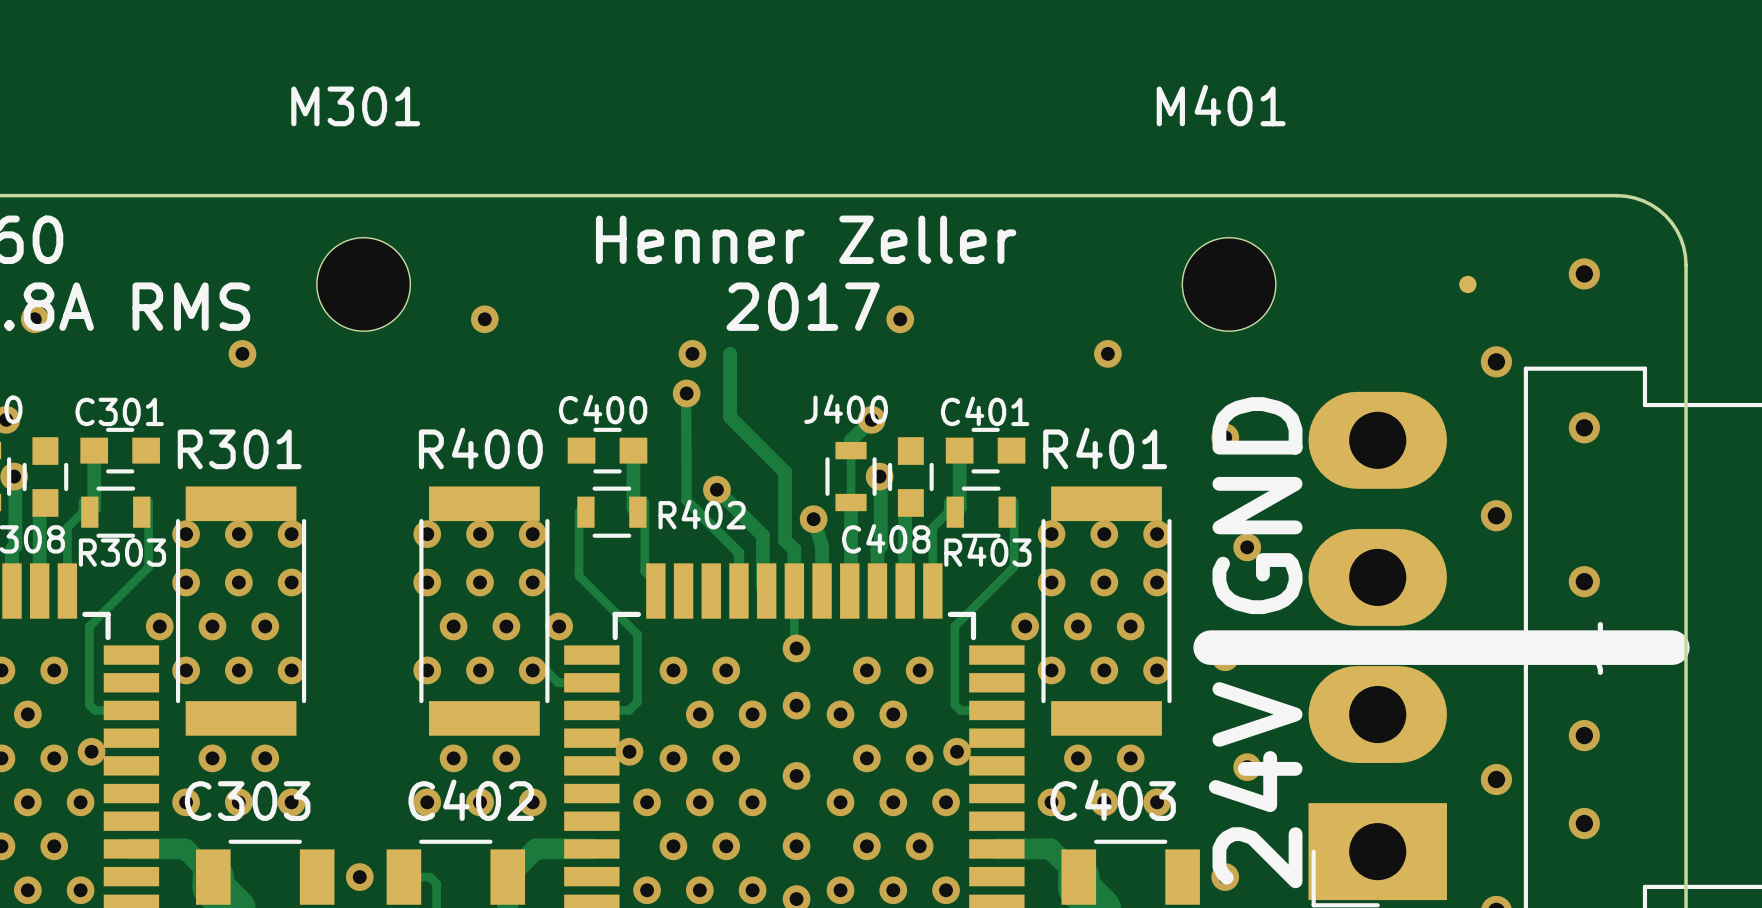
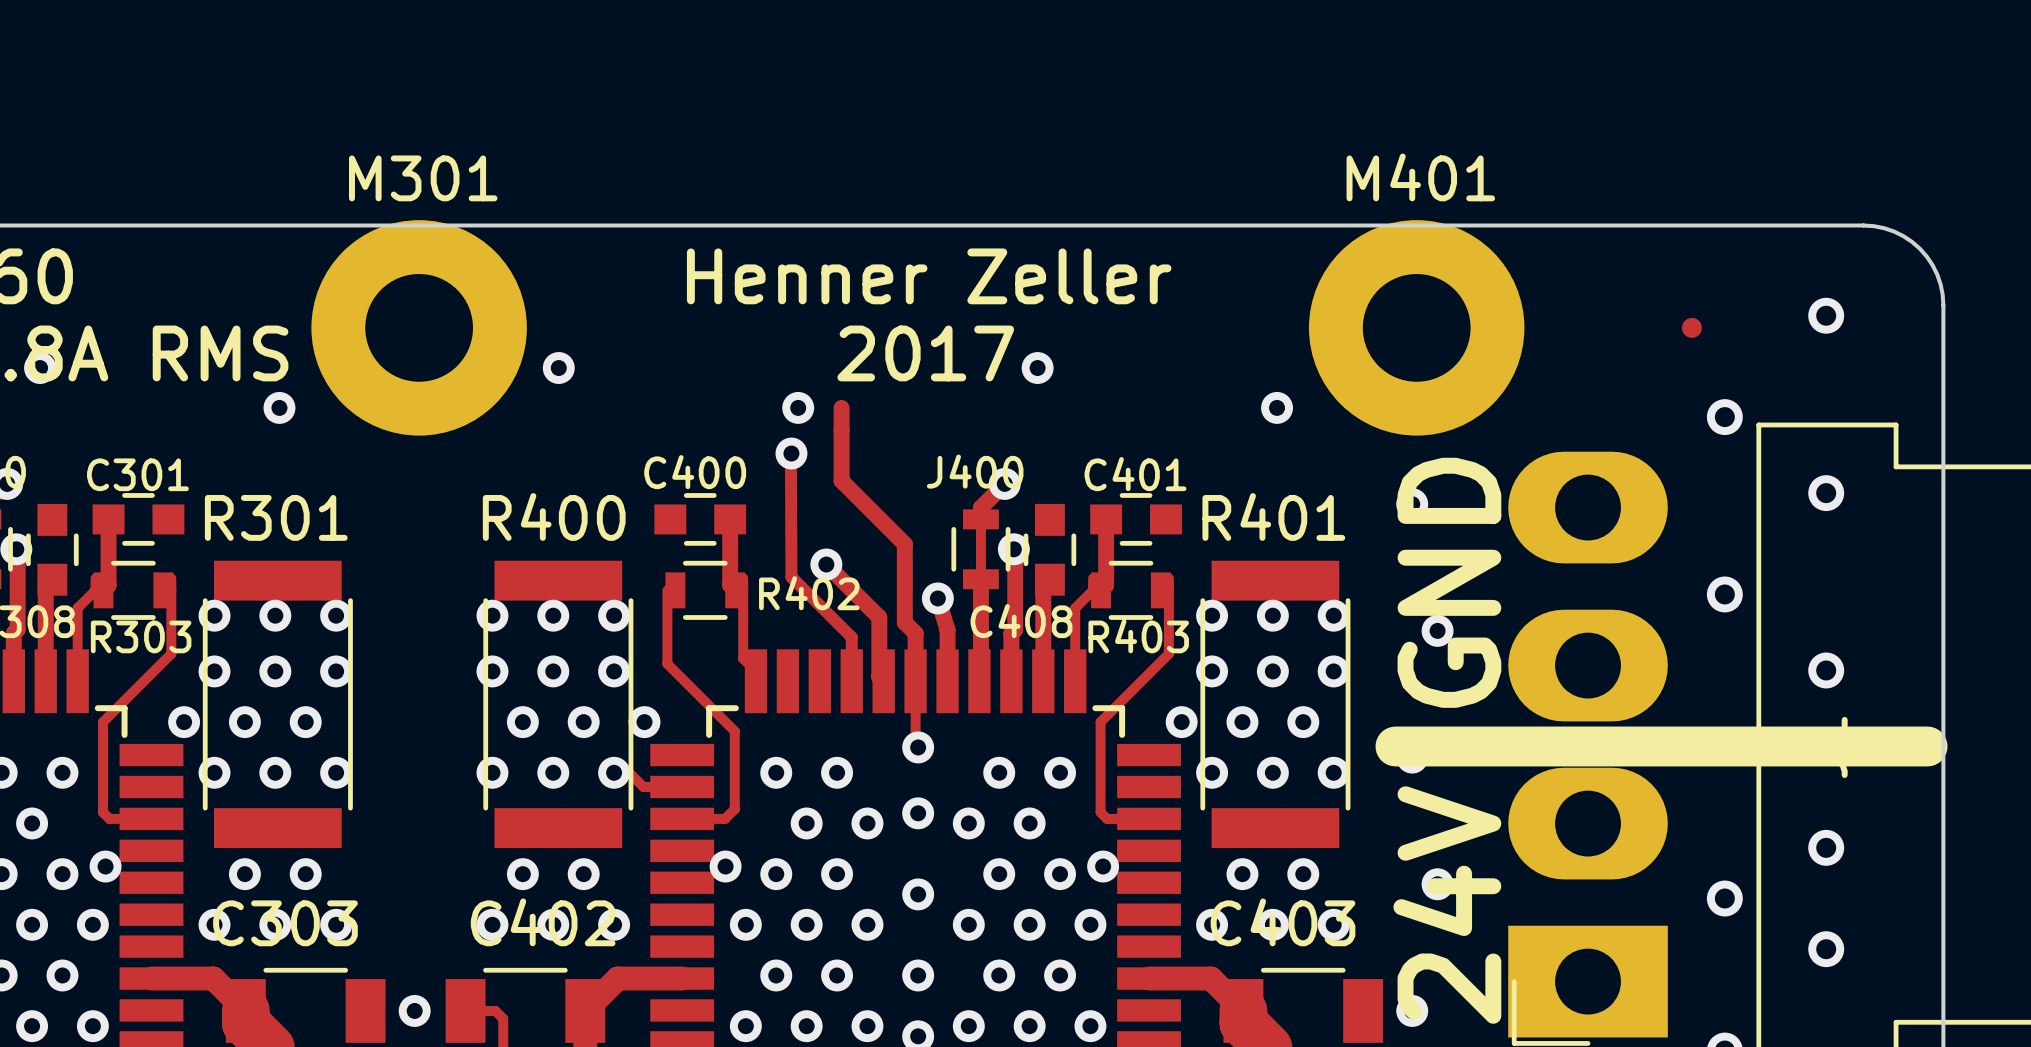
M301 footprint: [316, 237, 411, 332] -> [311, 220, 527, 436]
M401 footprint: [1182, 237, 1276, 332] -> [1308, 220, 1525, 436]

